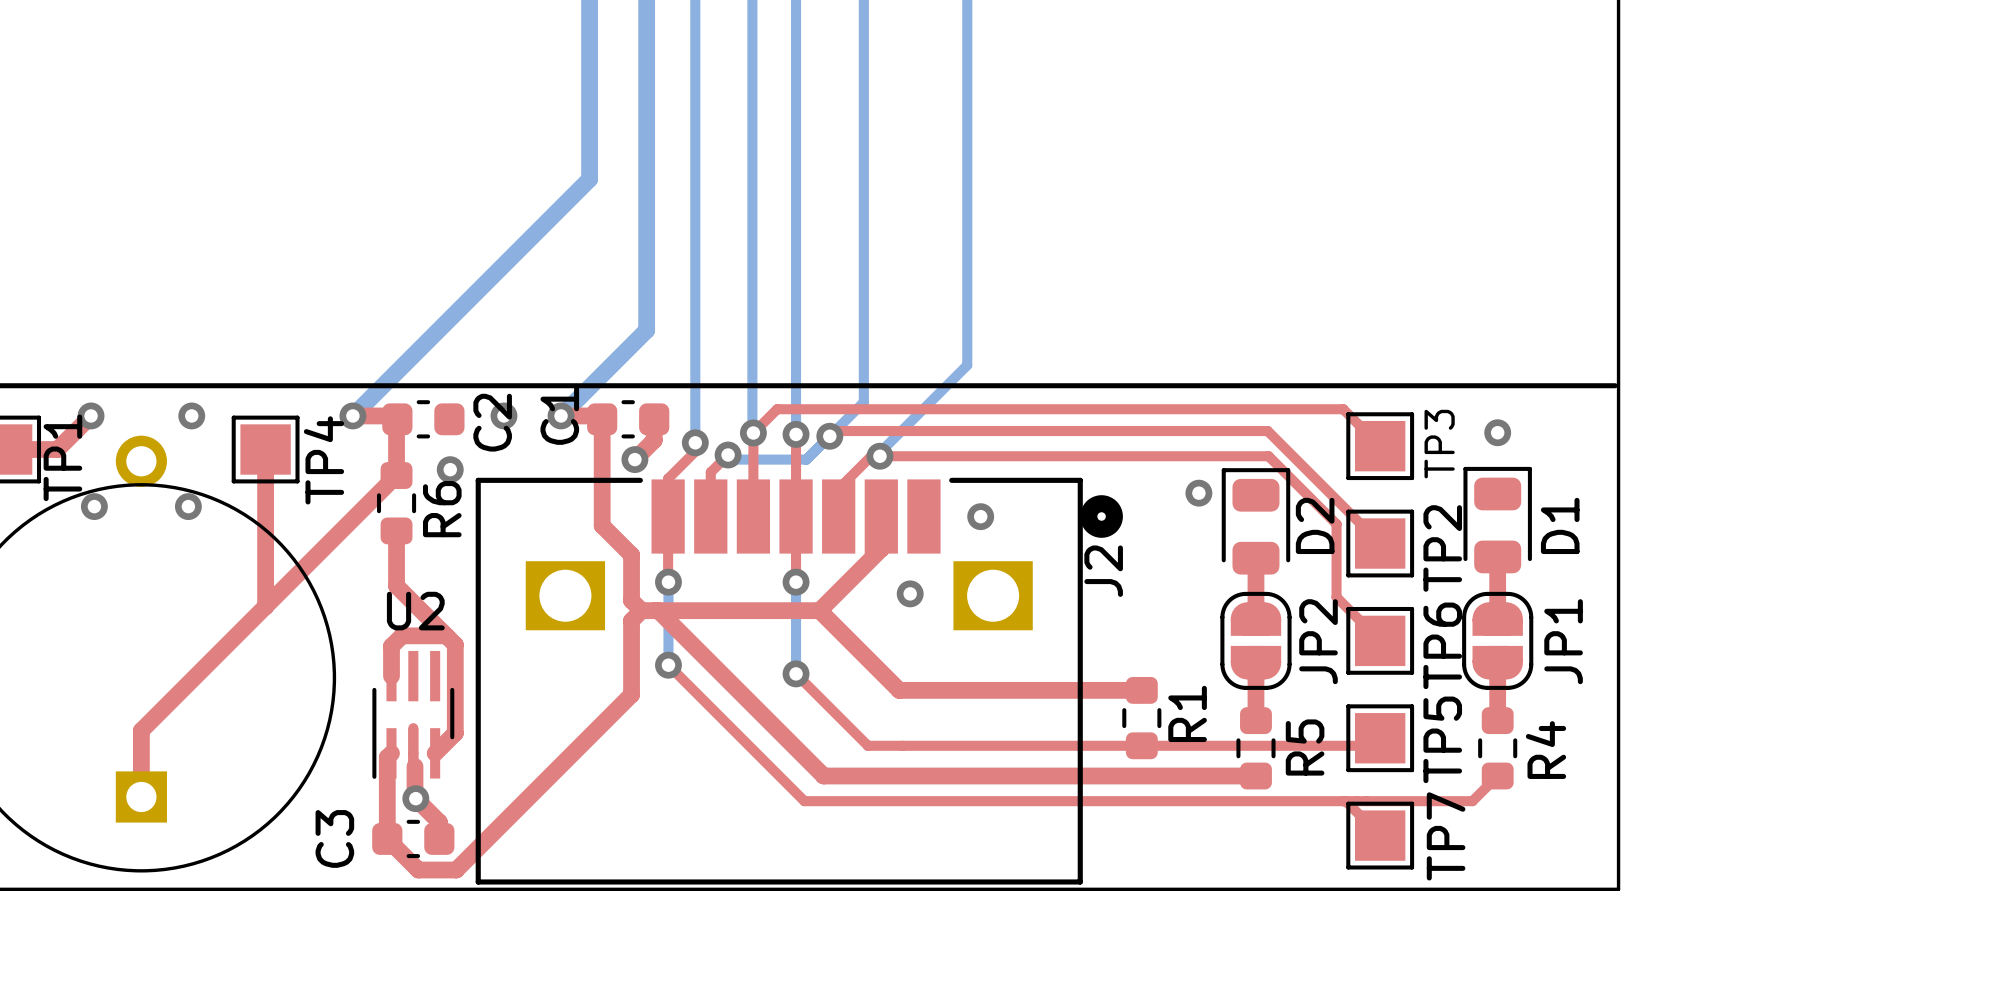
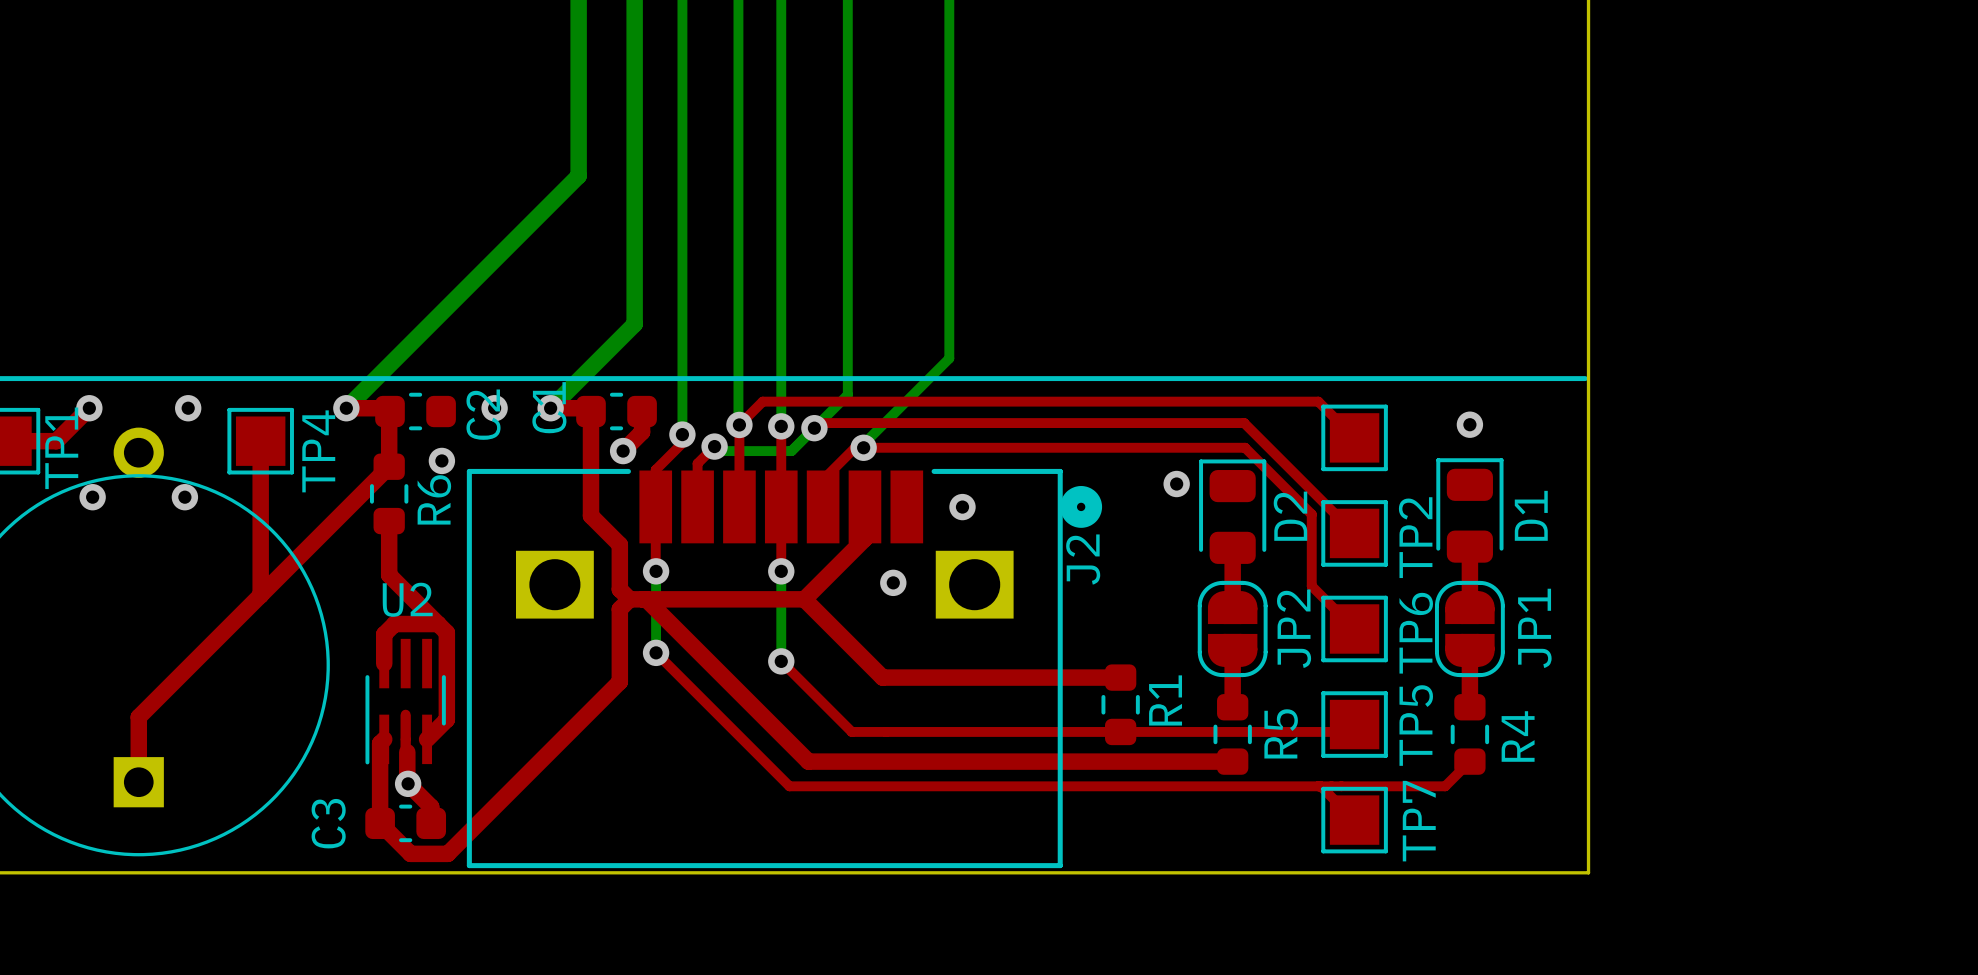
TP3 name: TP3 (1439, 444) -> none

